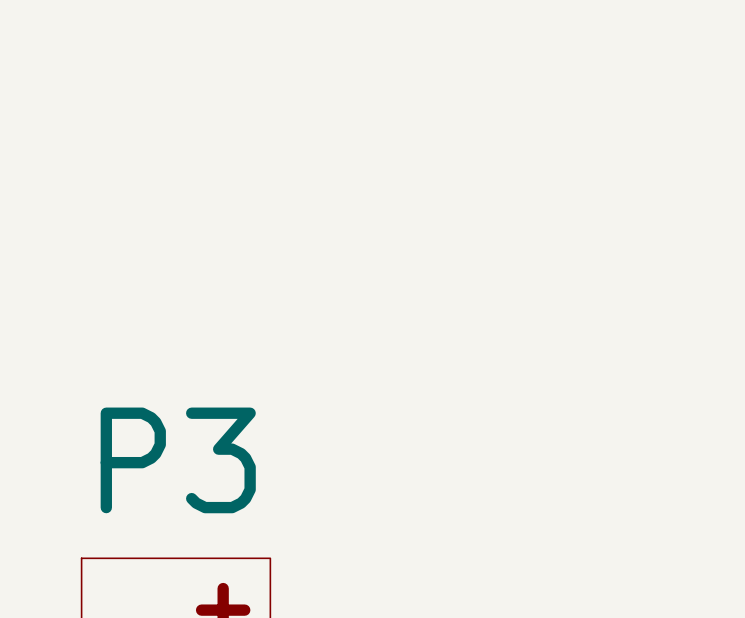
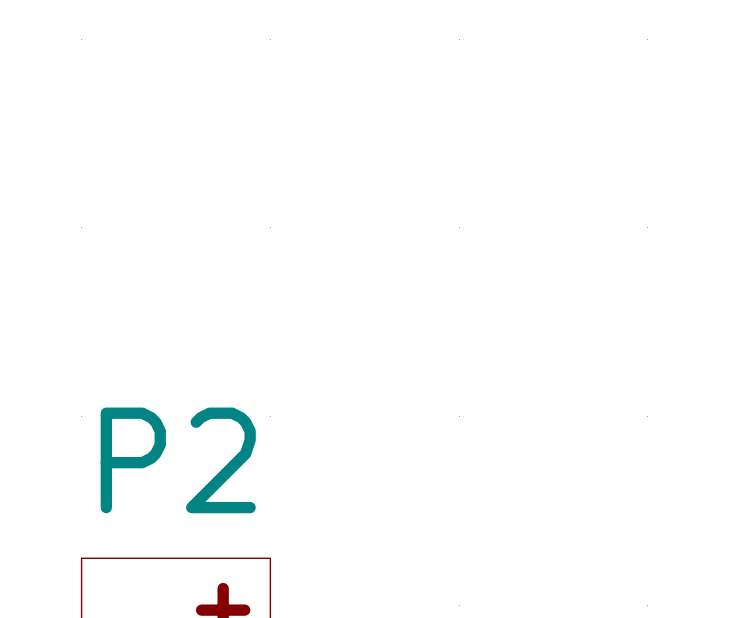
P3 name: P3 (178, 460) -> P2 (178, 460)

